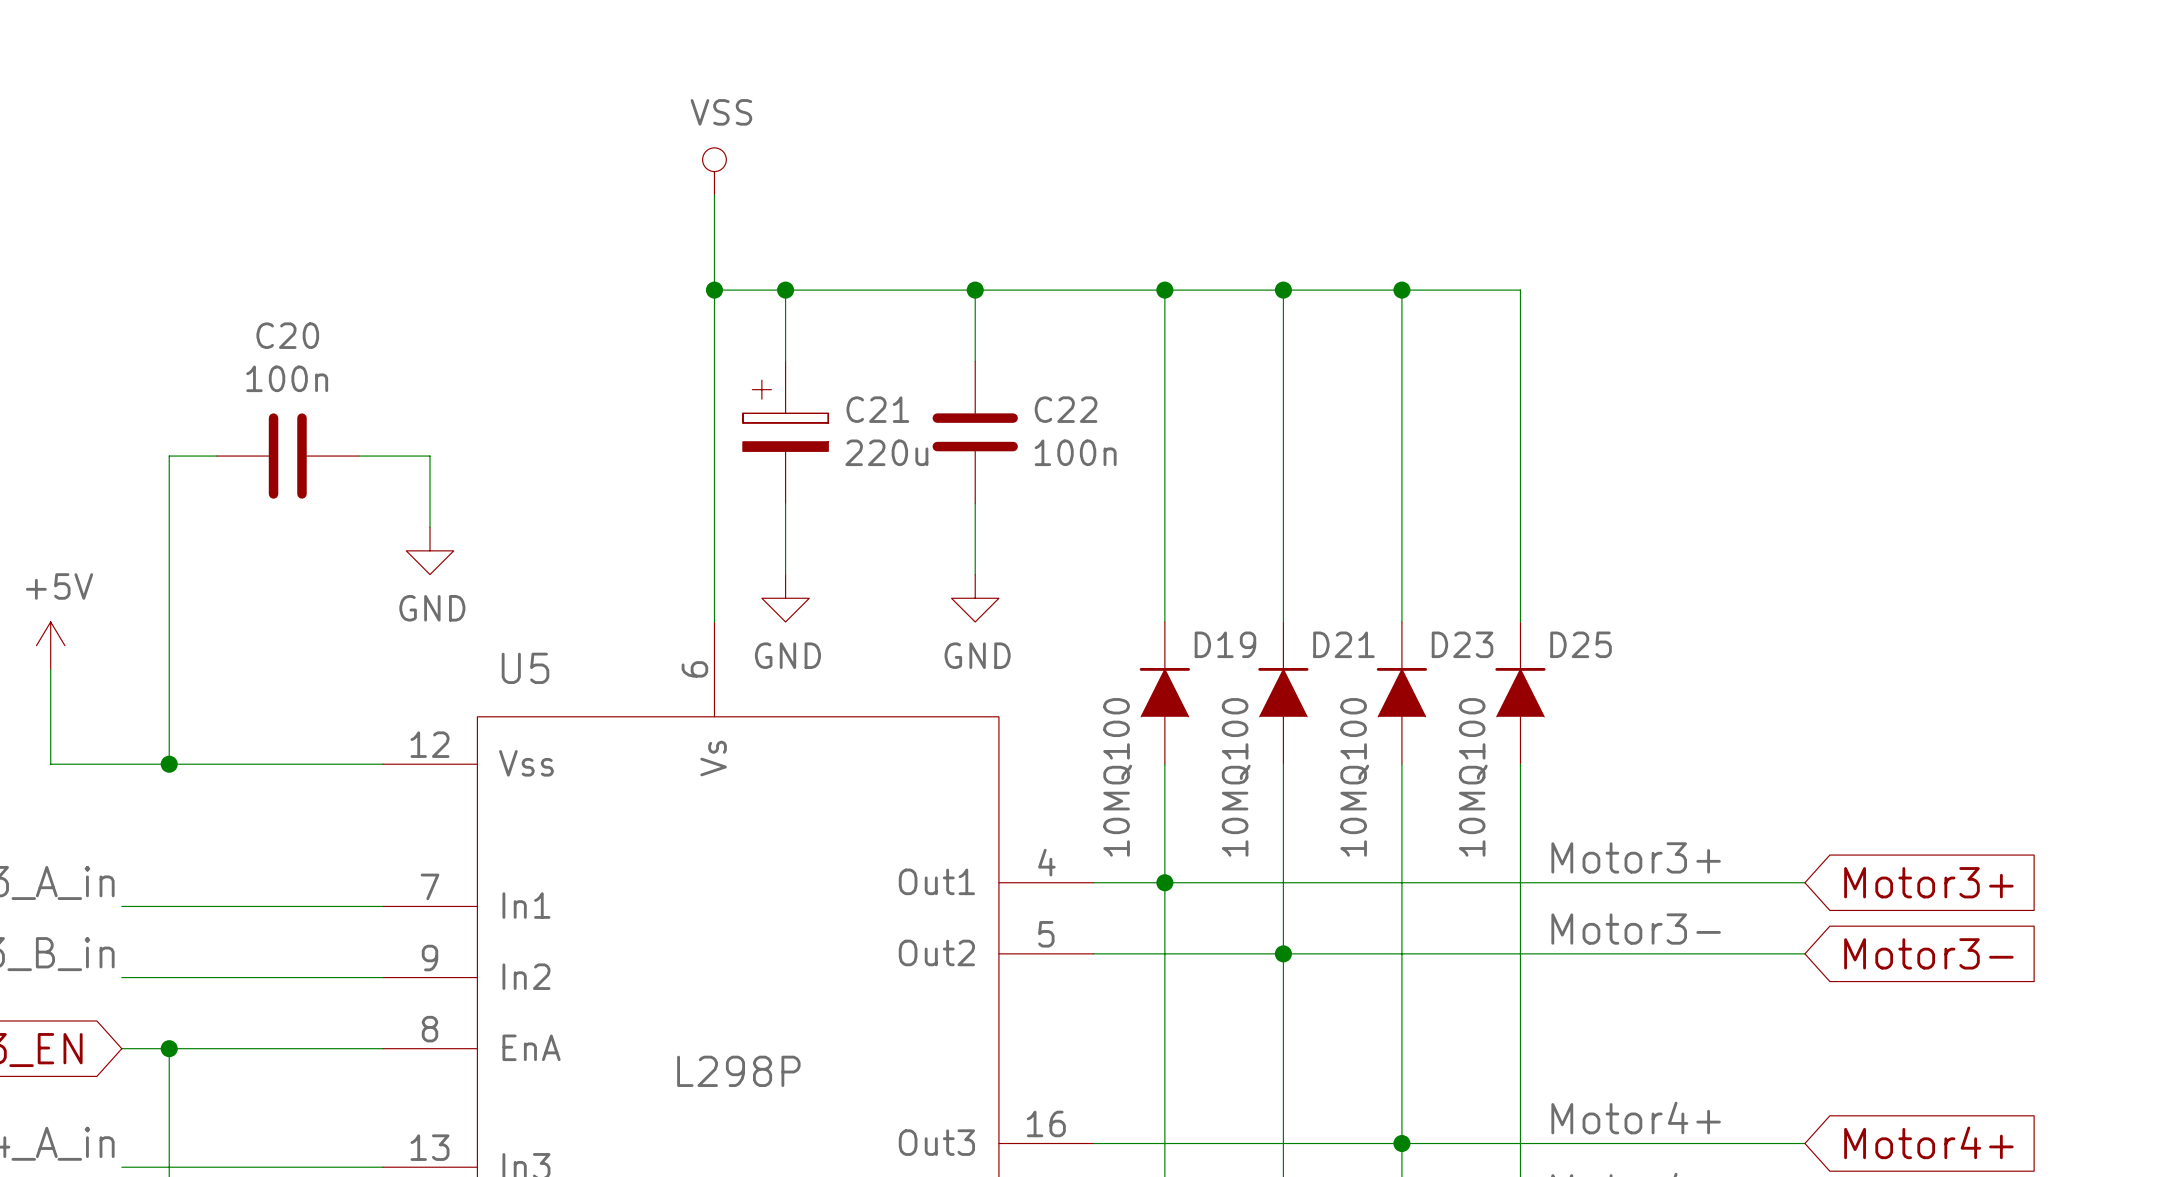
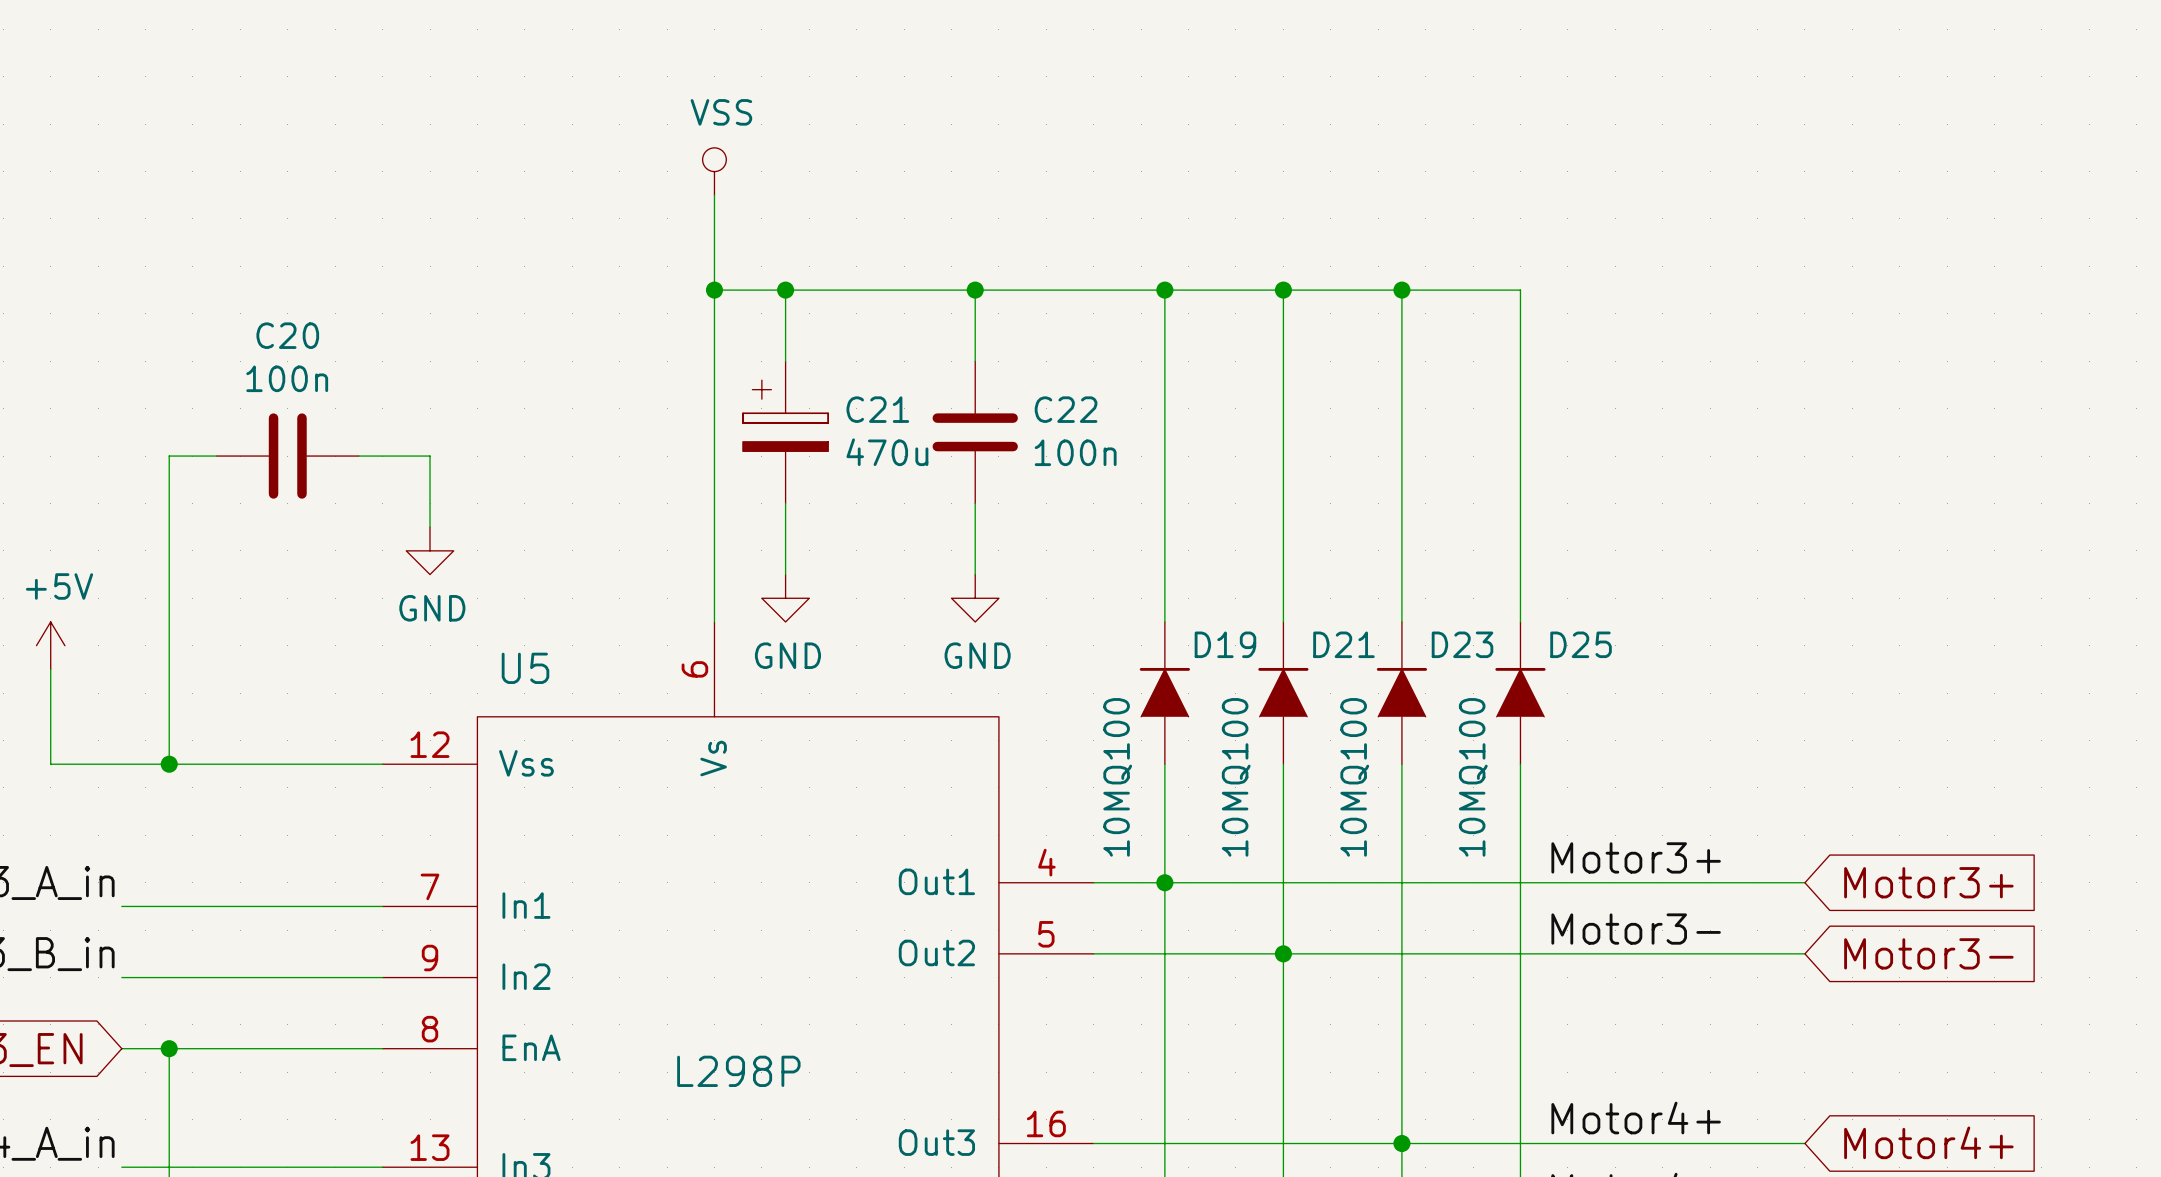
C21 value: 220u (886, 452) -> 470u (887, 452)

